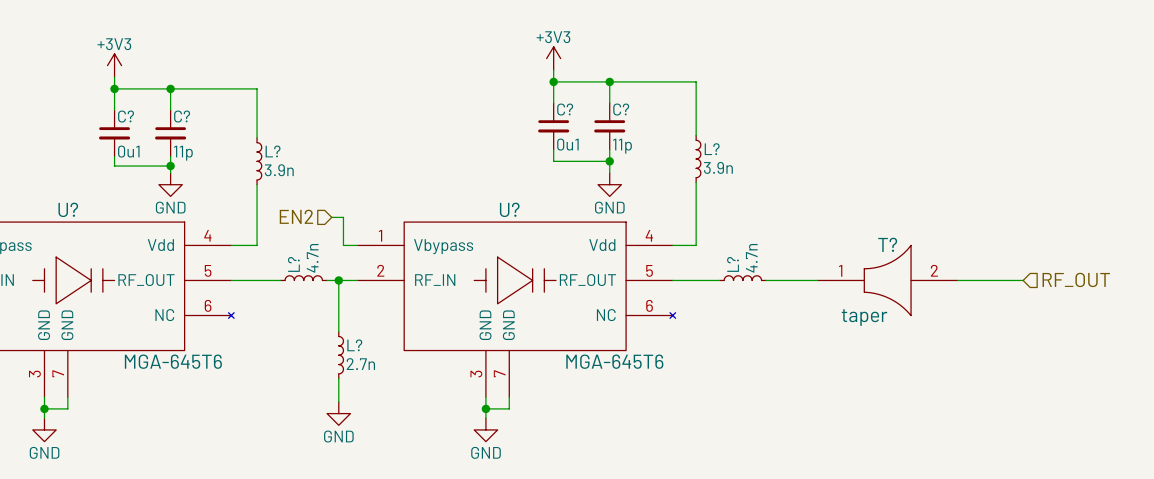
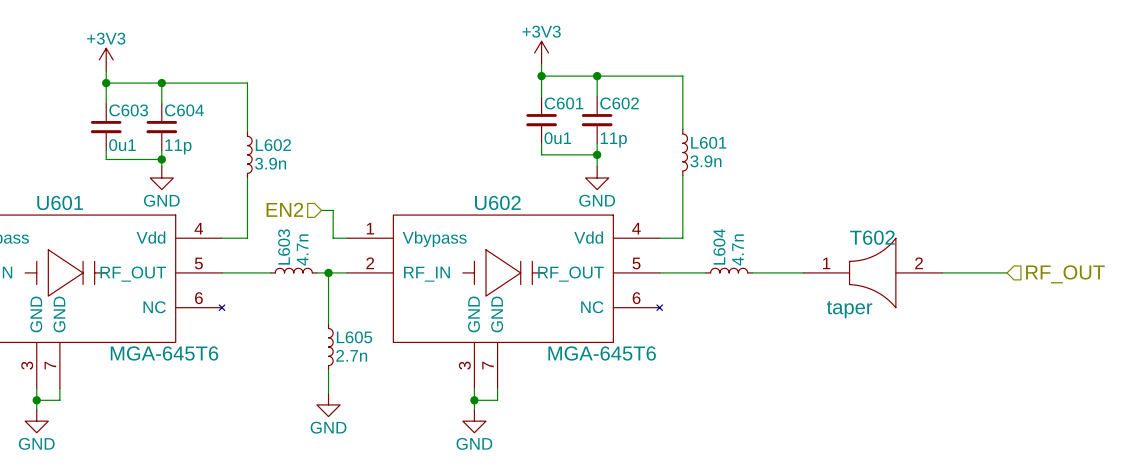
C? name: C? (565, 109) -> C601 (564, 103)
C? name: C? (621, 109) -> C602 (619, 103)
C? name: C? (126, 116) -> C603 (128, 110)
C? name: C? (182, 116) -> C604 (184, 110)
L? name: L? (712, 149) -> L601 (708, 142)
L? name: L? (273, 151) -> L602 (273, 145)
U? name: U? (68, 209) -> U601 (60, 202)
U? name: U? (509, 209) -> U602 (497, 202)
T? name: T? (887, 244) -> T602 (872, 237)
L? name: L? (293, 264) -> L603 (284, 246)
L? name: L? (733, 264) -> L604 (719, 246)
L? name: L? (354, 345) -> L605 (354, 337)

